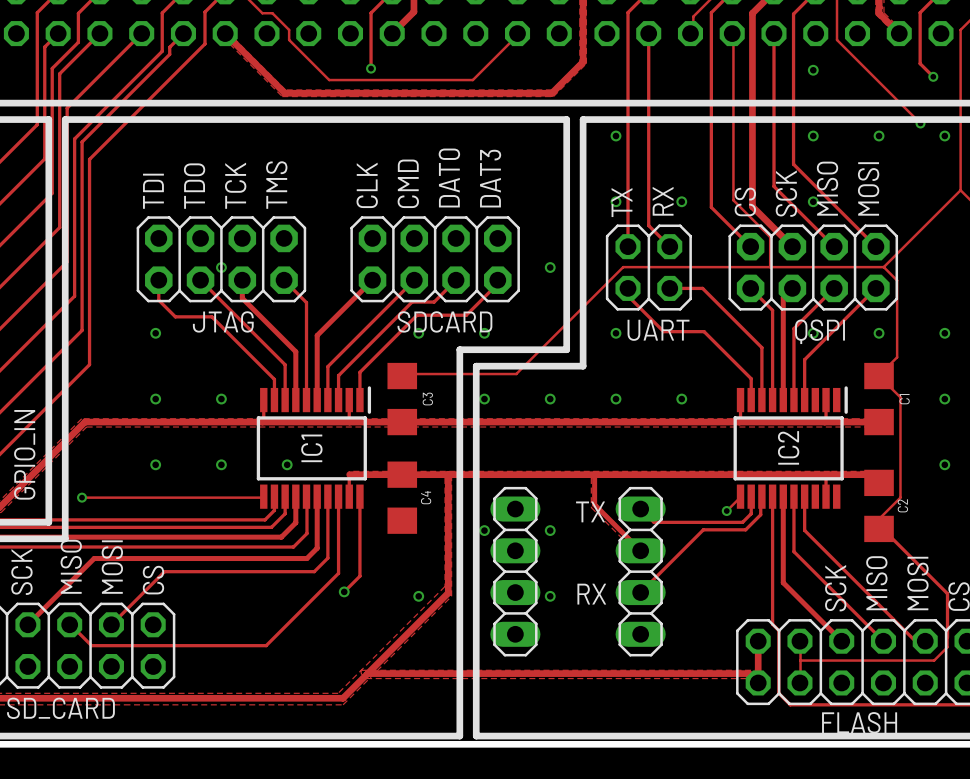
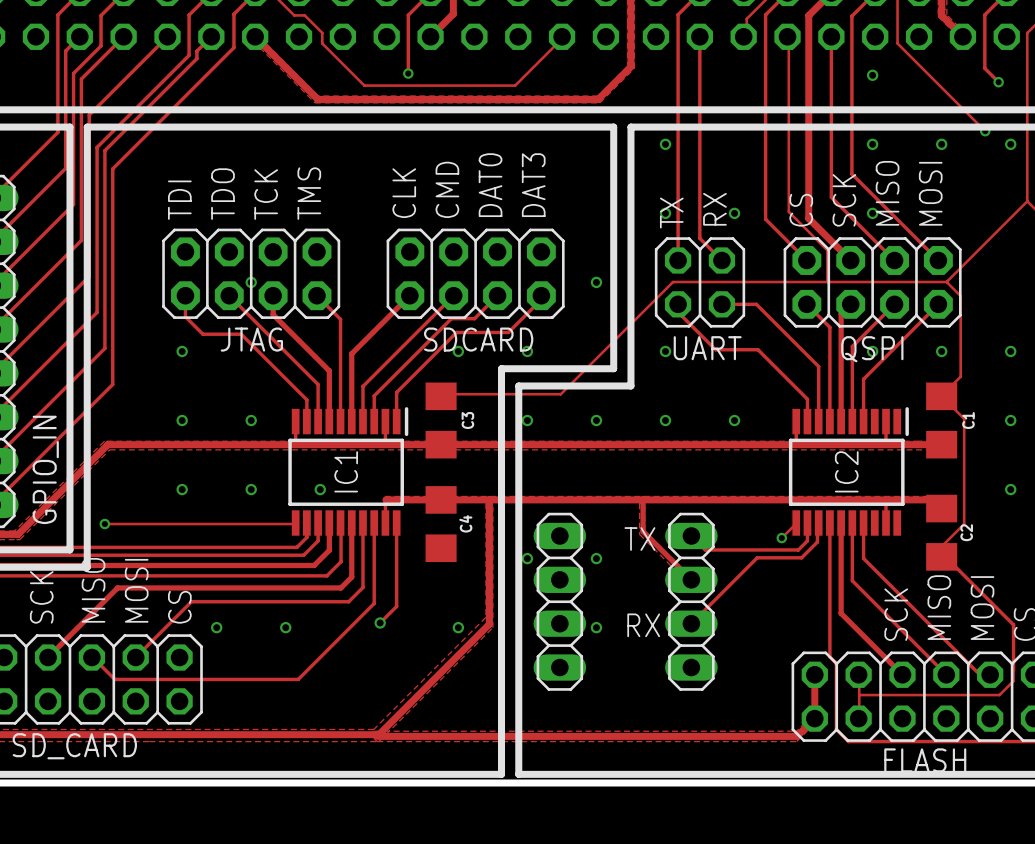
via: none -> (216, 627)
via: none -> (285, 627)
zone outline: (361, 670) (760, 670) (752, 678) (366, 678) (361, 673) (361, 670) -> none
track: (367, 673) (748, 673) (758, 682) -> (377, 736) (797, 736) (814, 718)
zone outline: none -> (377, 741) (373, 738) (373, 731) (796, 731) (812, 715) (815, 719) (815, 722) (796, 741) (378, 741)

